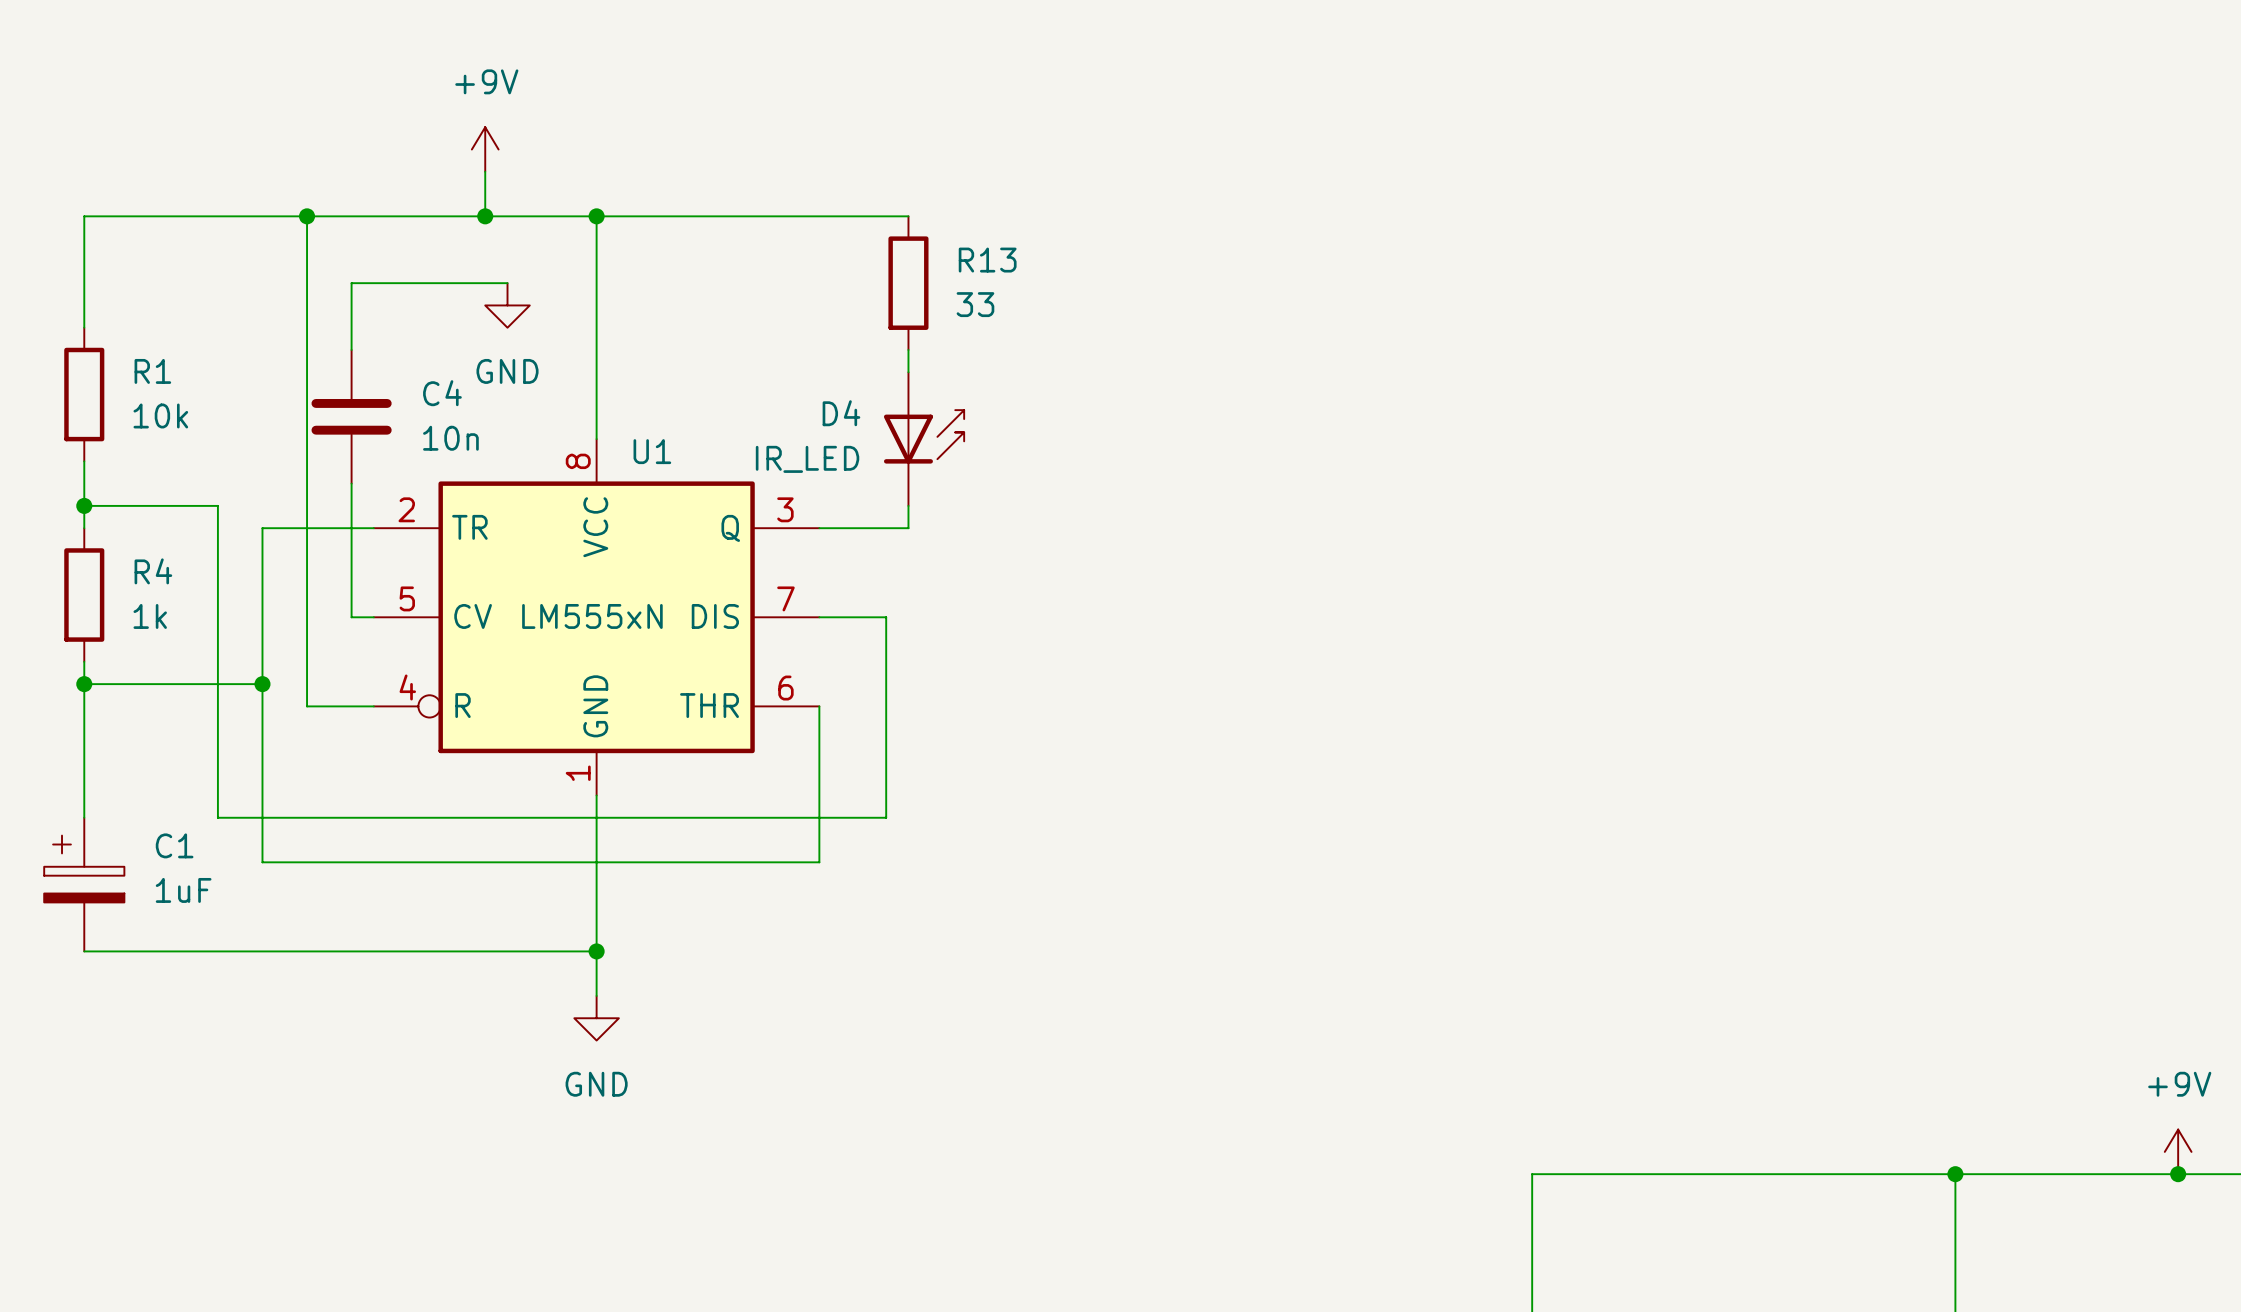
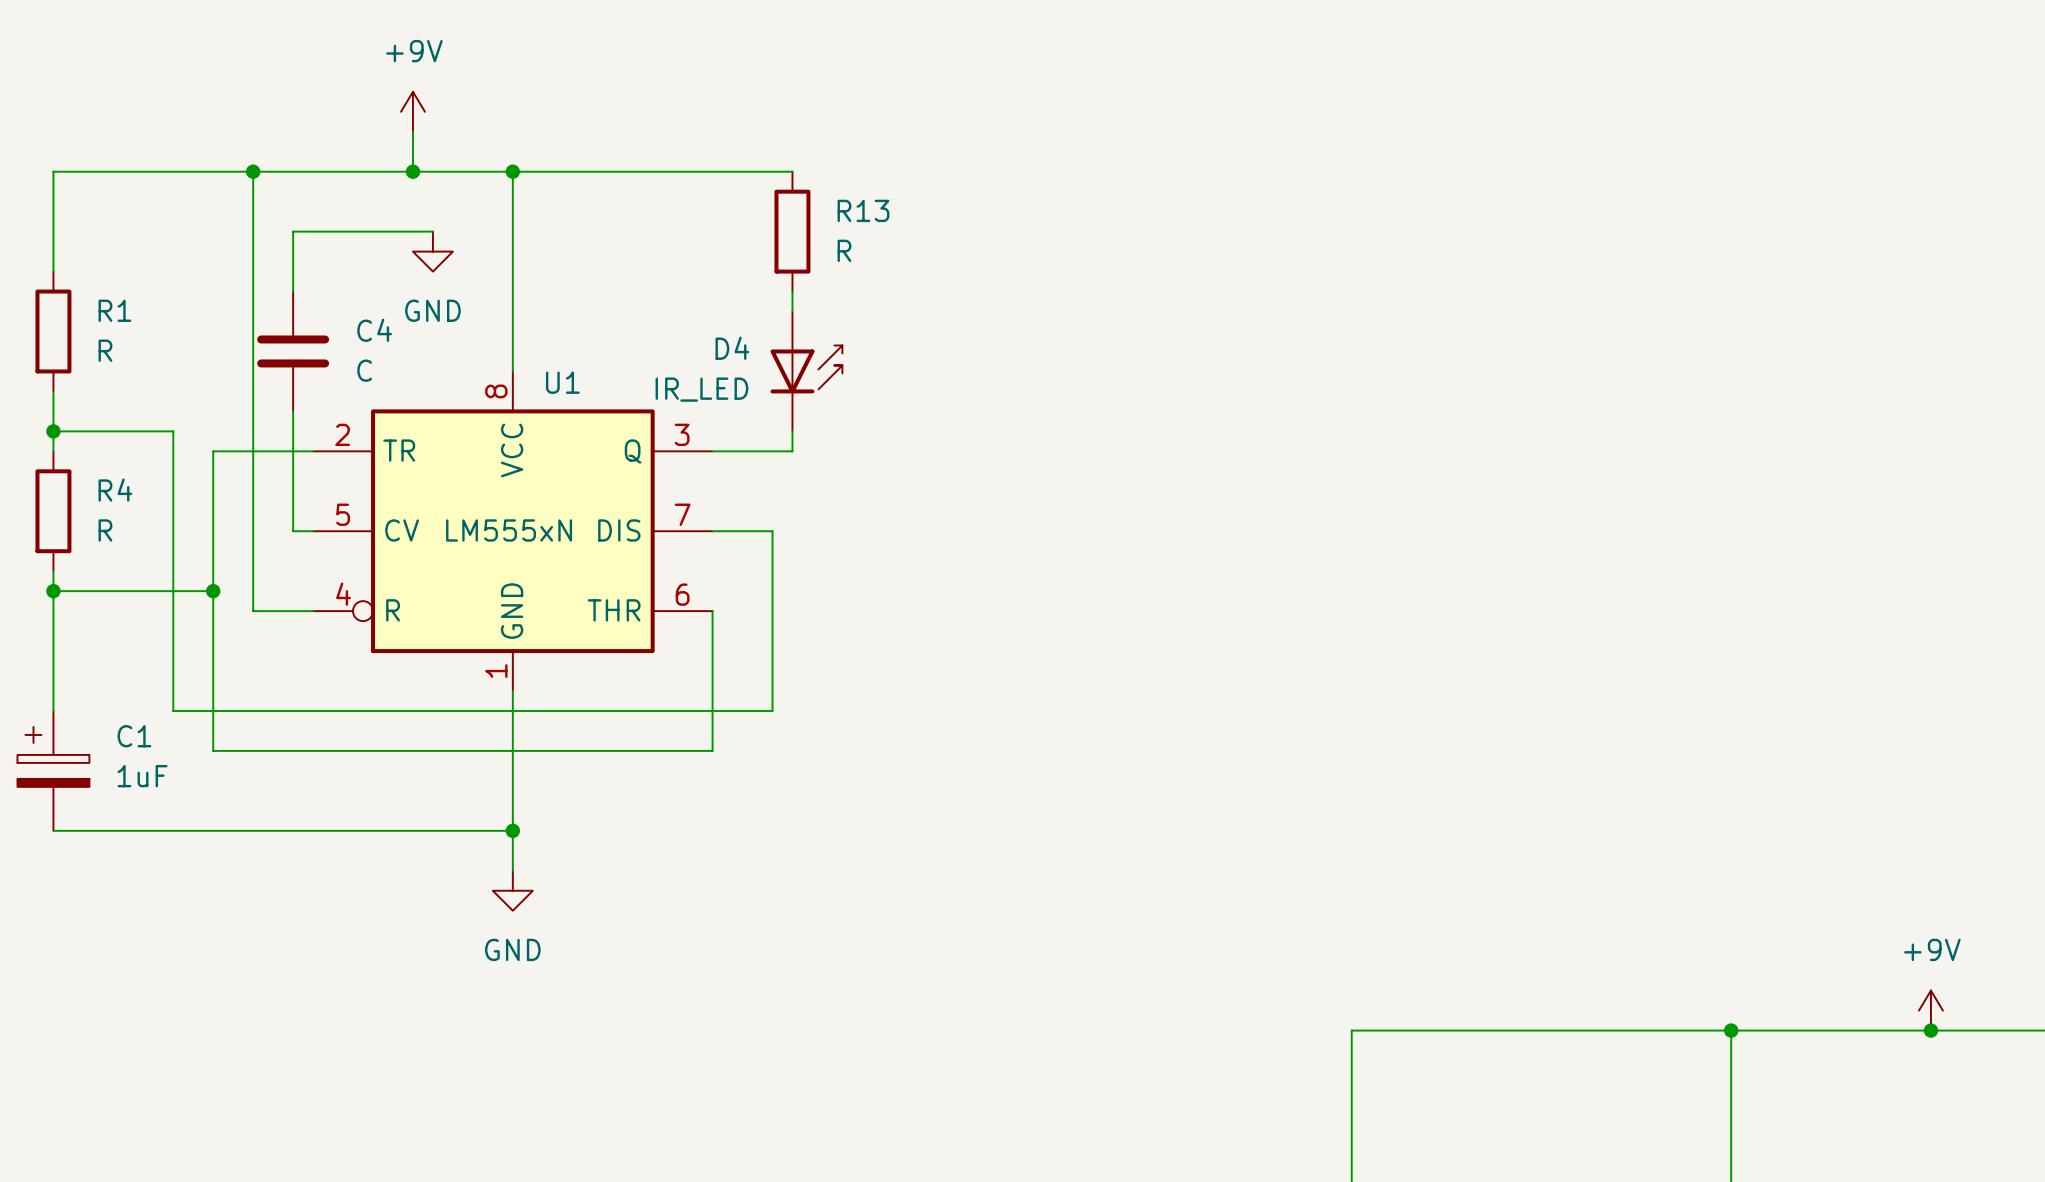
R13 value: 33 (975, 304) -> R (844, 250)
R1 value: 10k (160, 415) -> R (105, 350)
C4 value: 10n (450, 438) -> C (364, 370)
R4 value: 1k (150, 616) -> R (105, 530)

